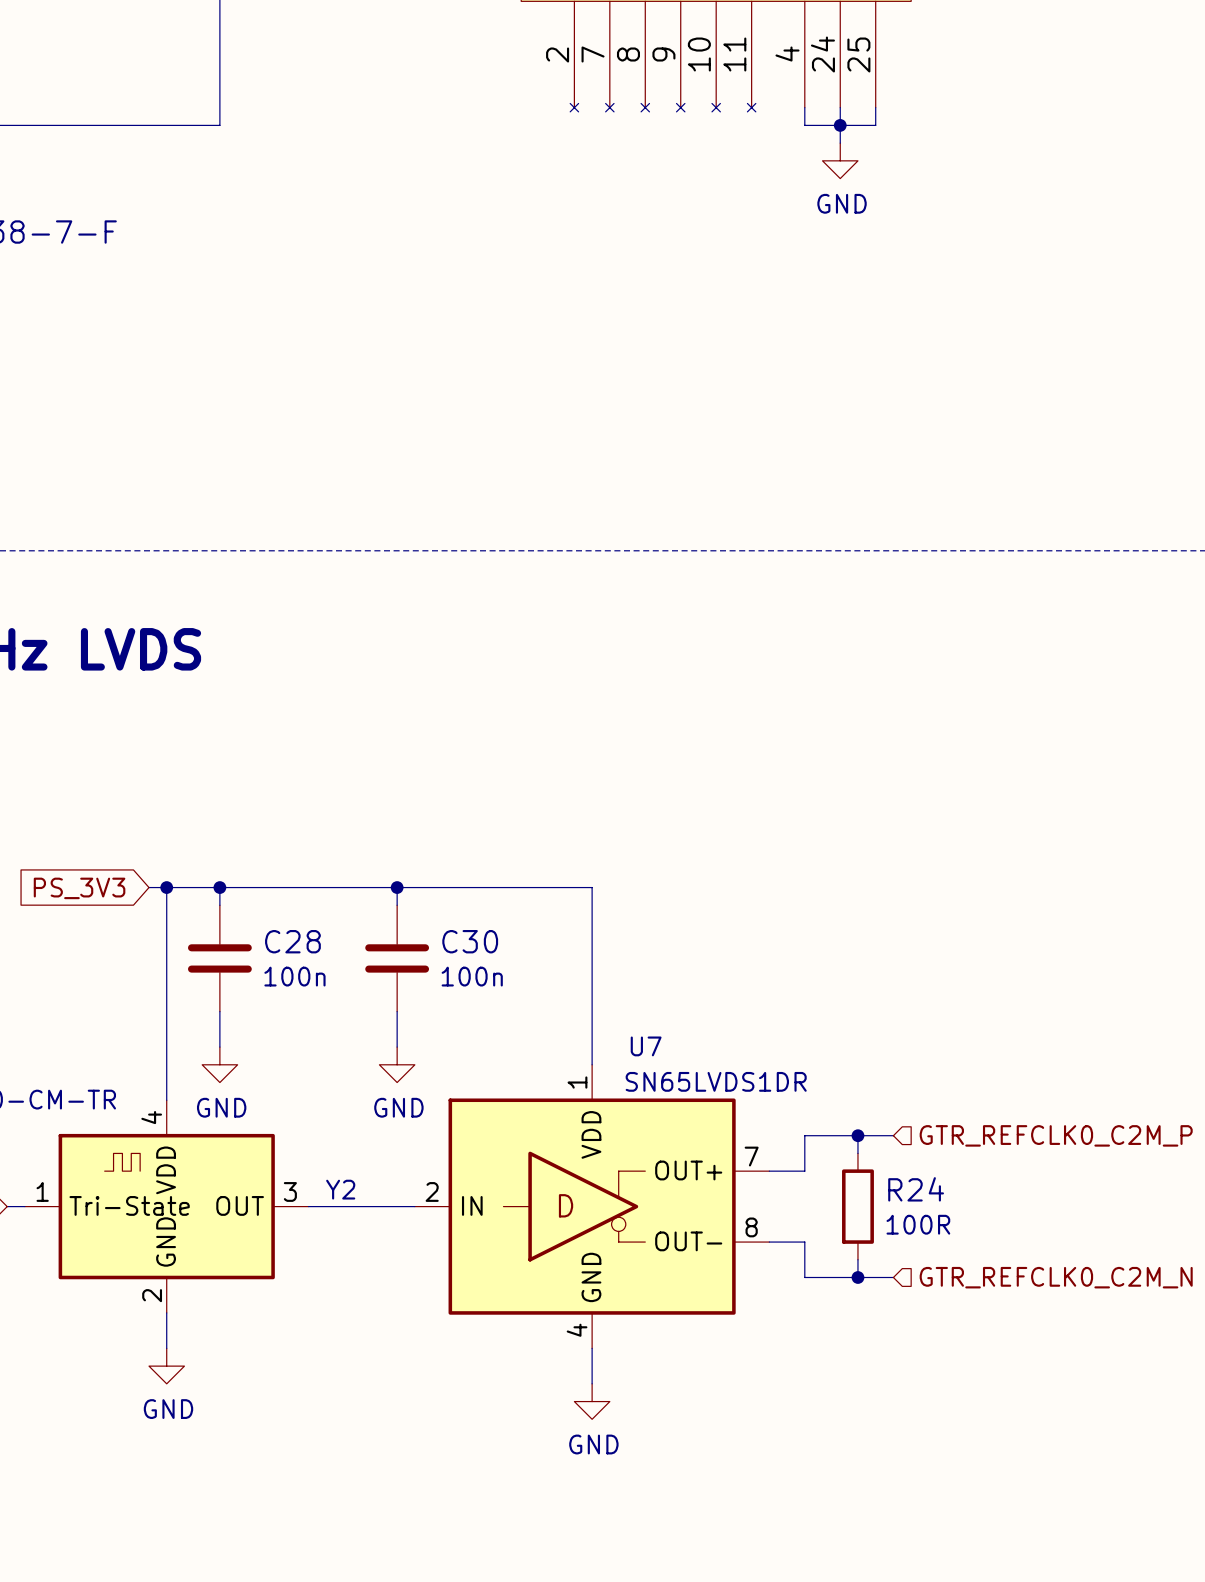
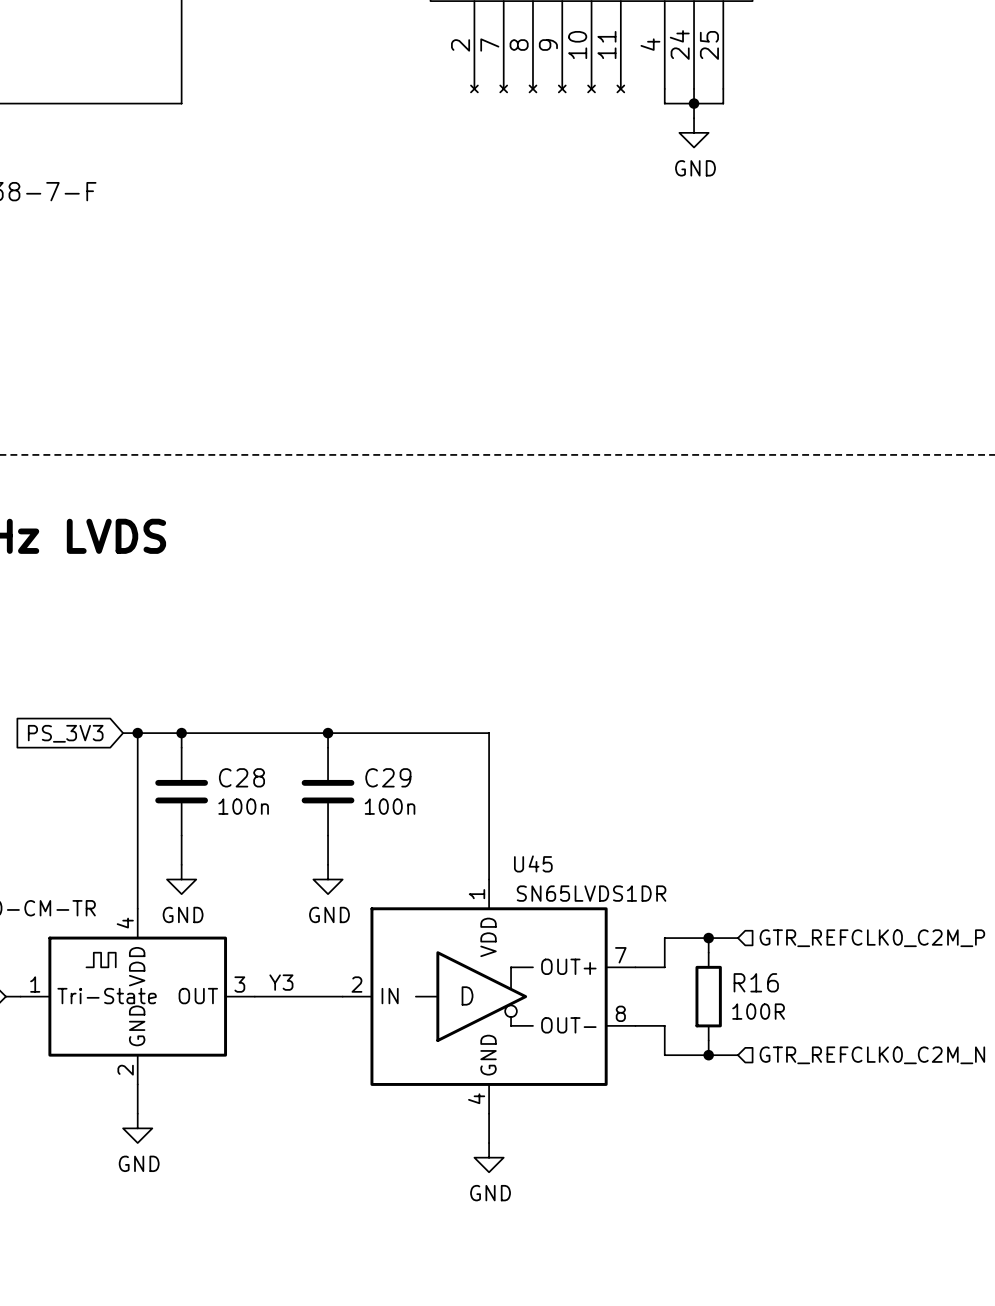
C30 name: C30 (470, 941) -> C29 (388, 777)
U7 name: U7 (646, 1046) -> U45 (533, 863)
Y2 name: Y2 (340, 1189) -> Y3 (281, 982)
R24 name: R24 (916, 1189) -> R16 (756, 982)

